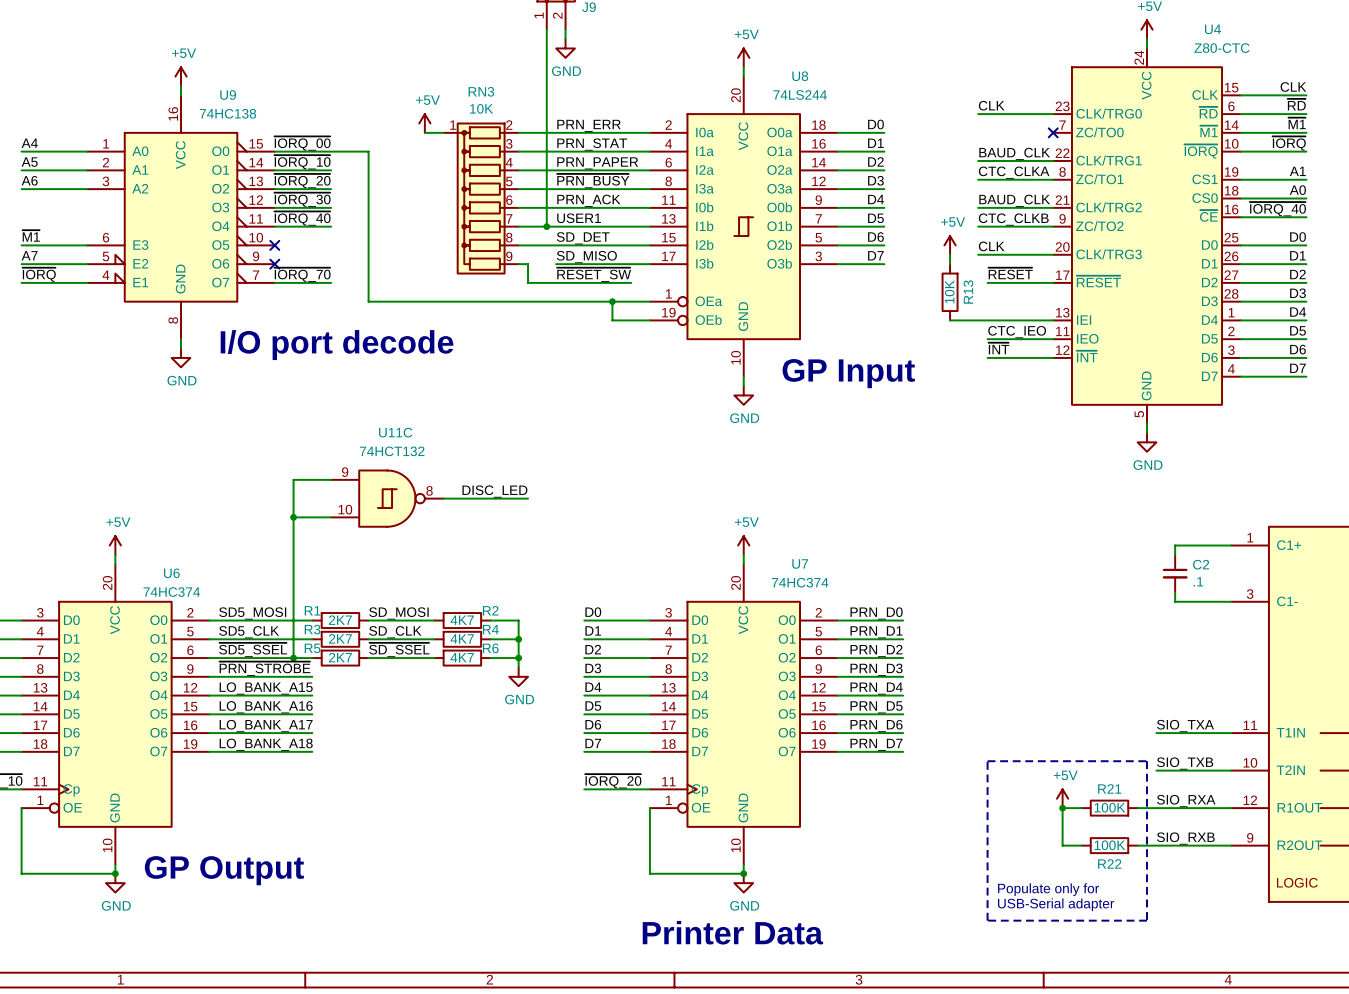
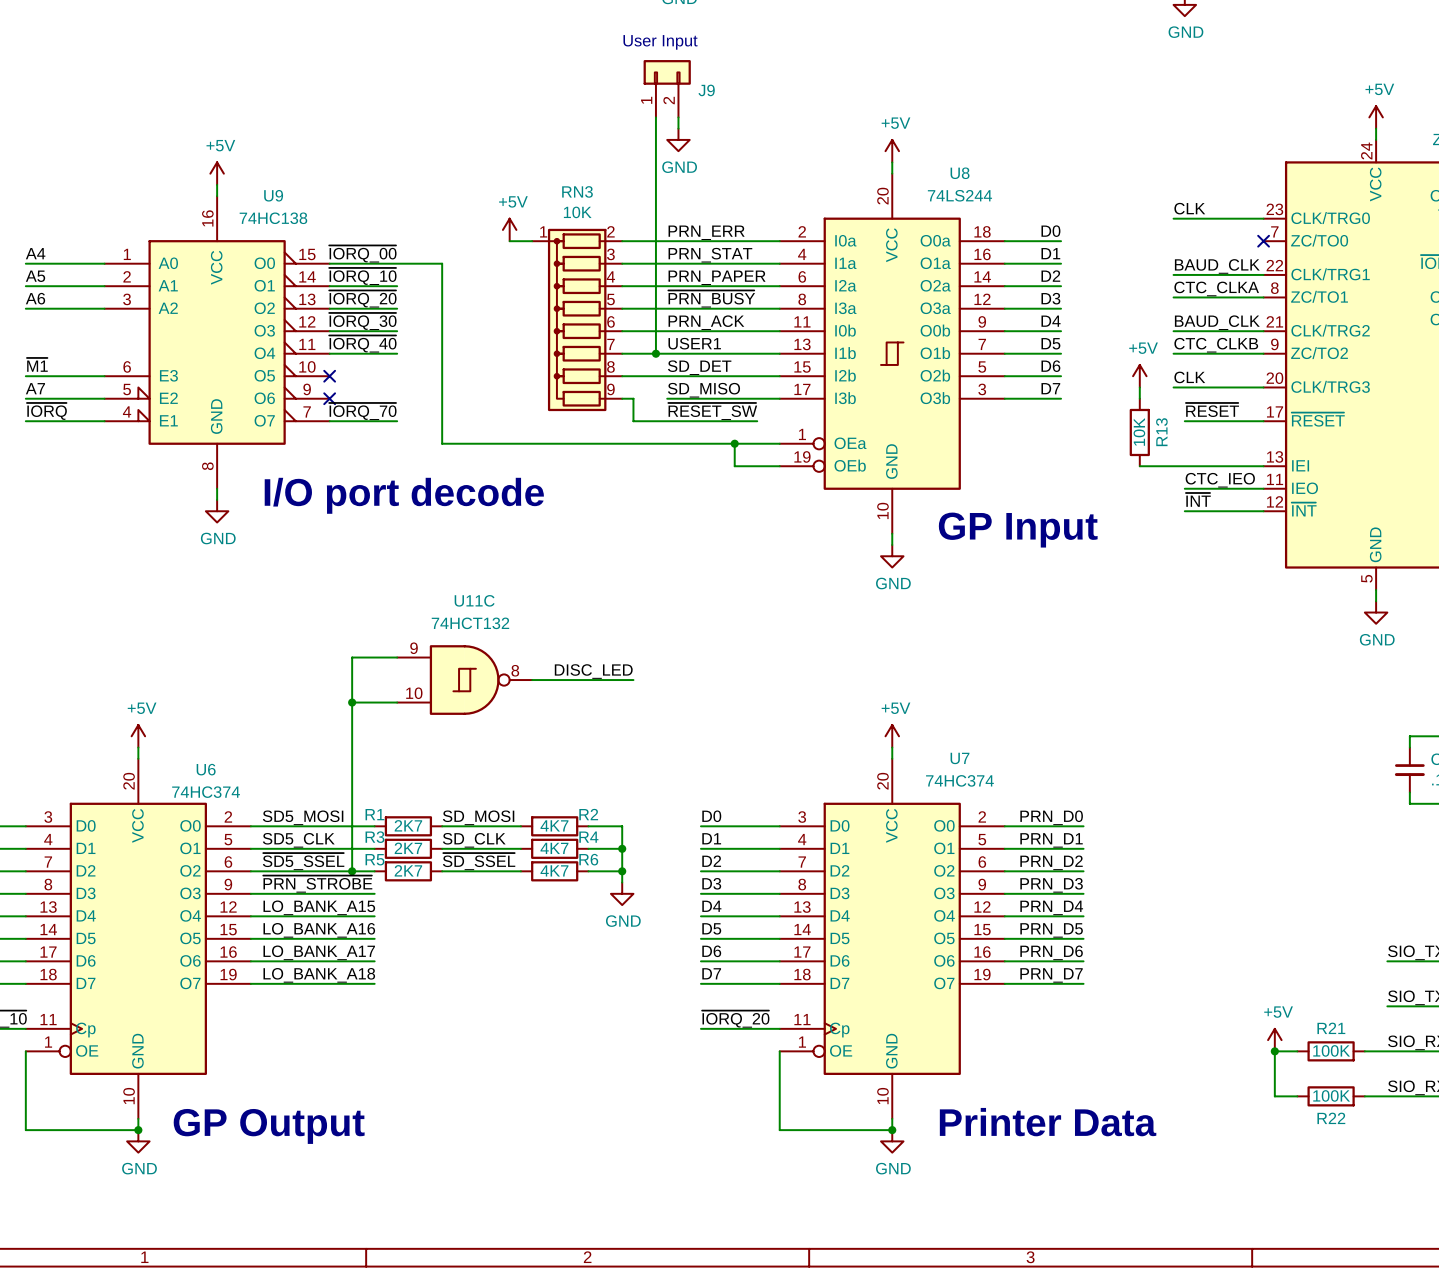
line: (987, 761) (1147, 761) (1147, 920) (987, 920) (987, 761) -> none
text: Populate only for (1048, 889) -> none
text: USB-Serial adapter (1056, 904) -> none
text position: Printer Data (732, 932) -> Printer Data (1048, 1122)

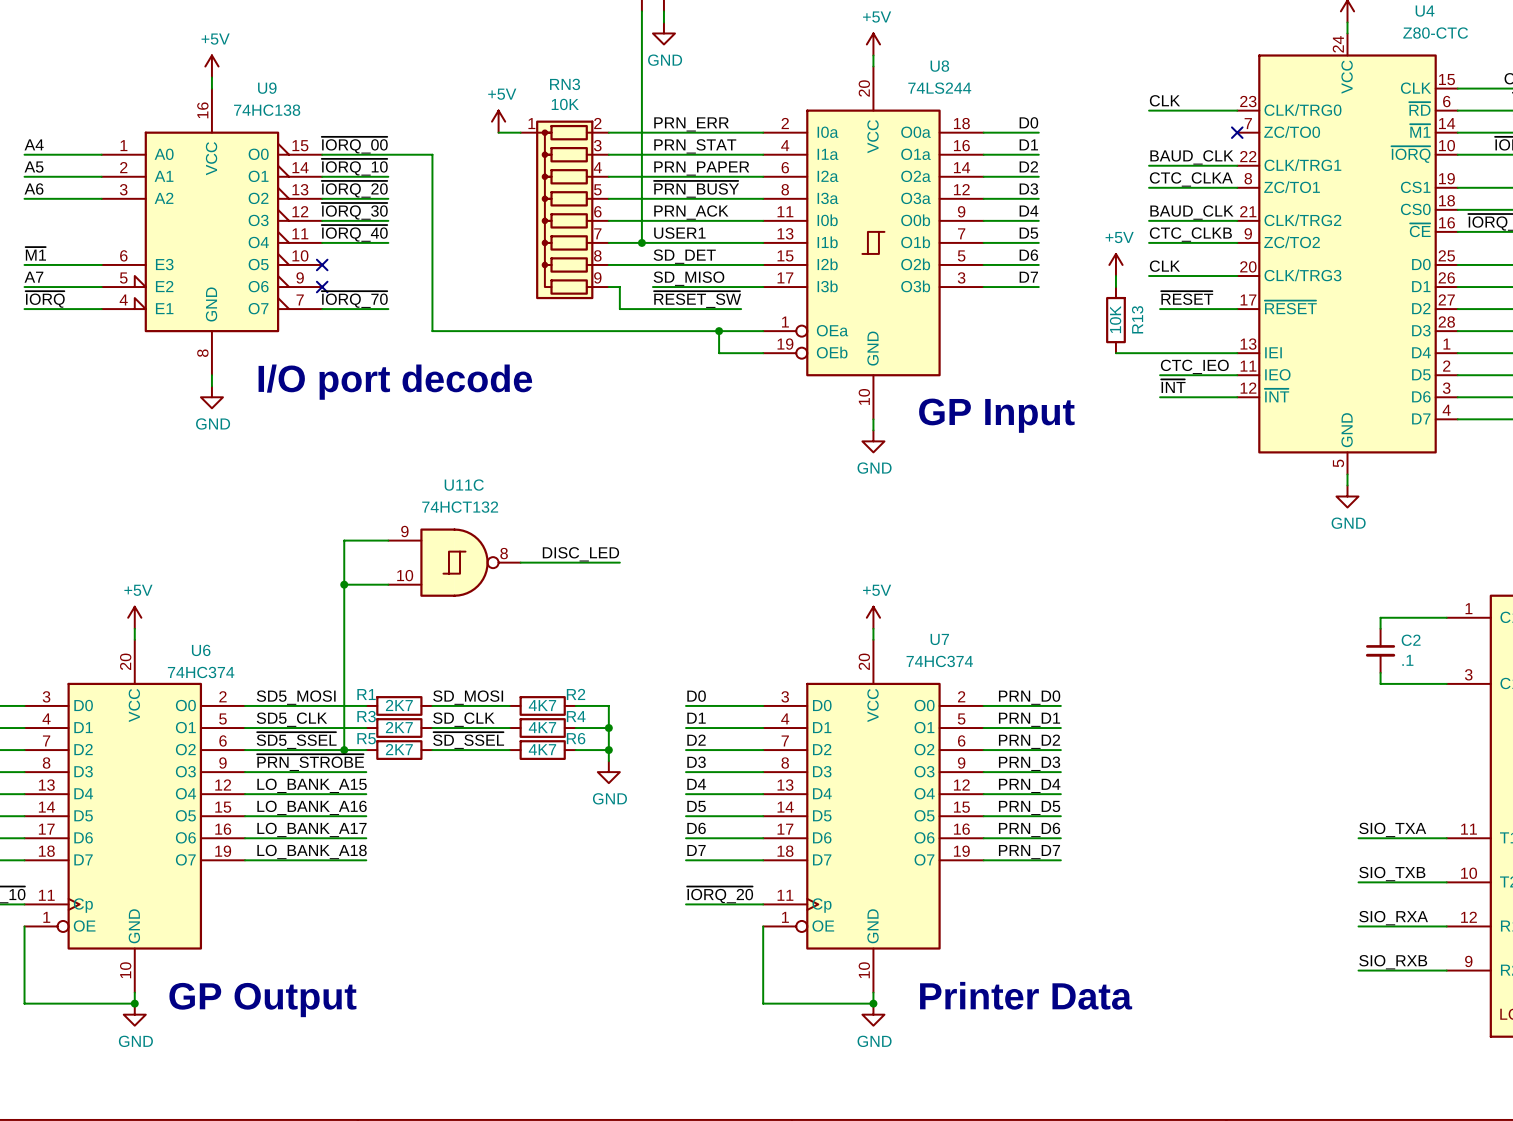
power symbol: +5V (1274, 1040) -> none
junction: (1274, 1051) -> none
wire: (1297, 1051) (1274, 1051) (1274, 1096) (1297, 1096) -> none
R21: 100K (1331, 1051) -> none
wire: (1364, 1051) (1387, 1051) -> none
R22: 100K (1331, 1096) -> none
wire: (1364, 1096) (1387, 1096) -> none

